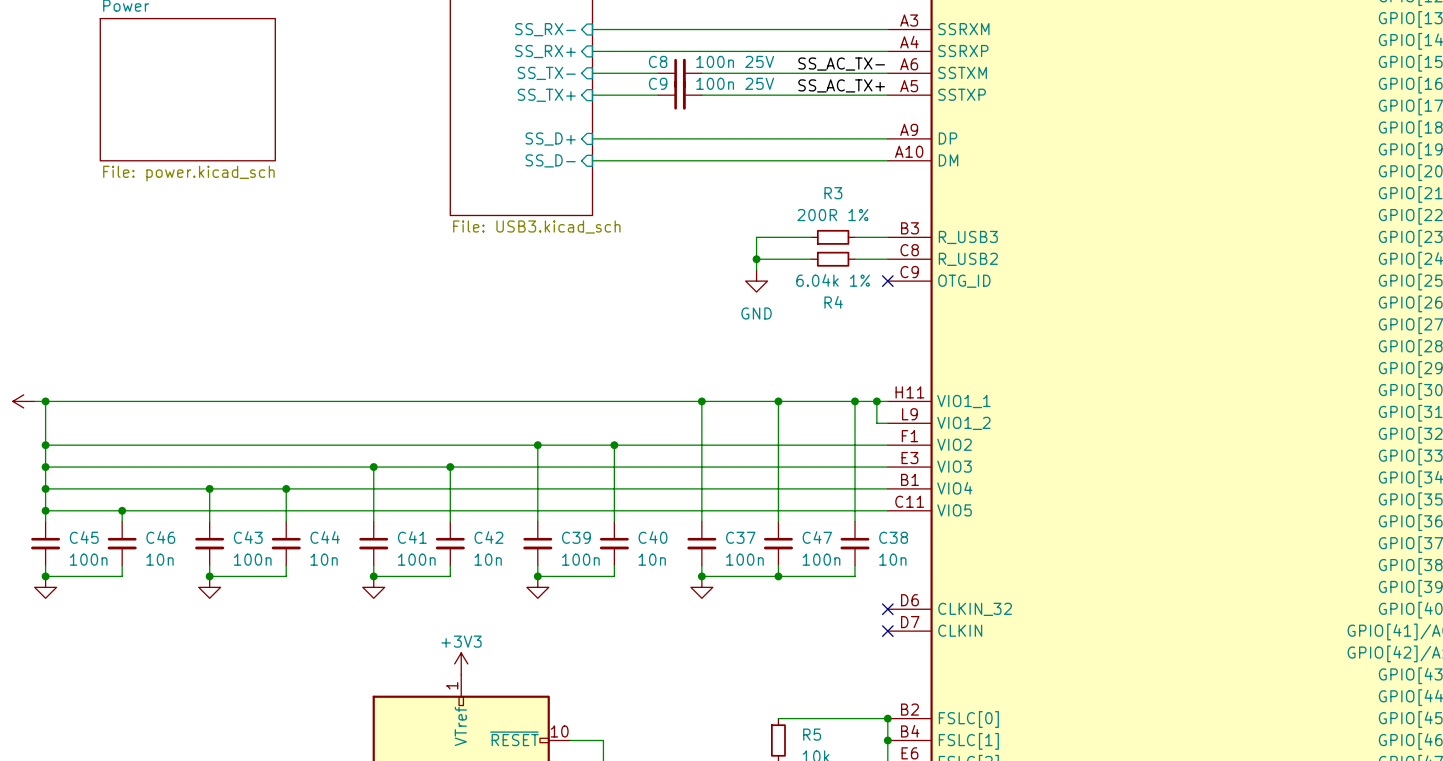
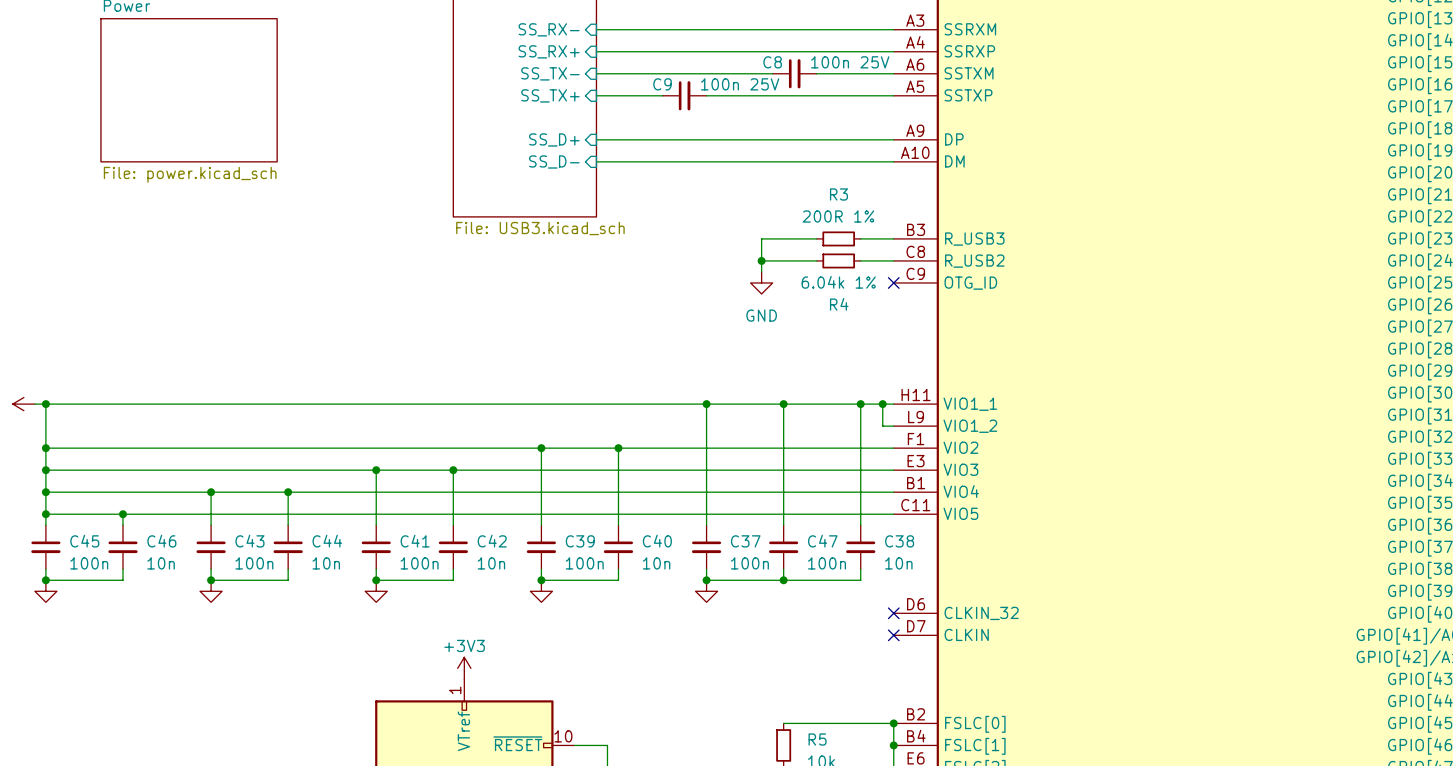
label: SS_AC_TX- (841, 64) -> none
C8 position: (679, 73) -> (794, 73)
label: SS_AC_TX+ (841, 85) -> none

